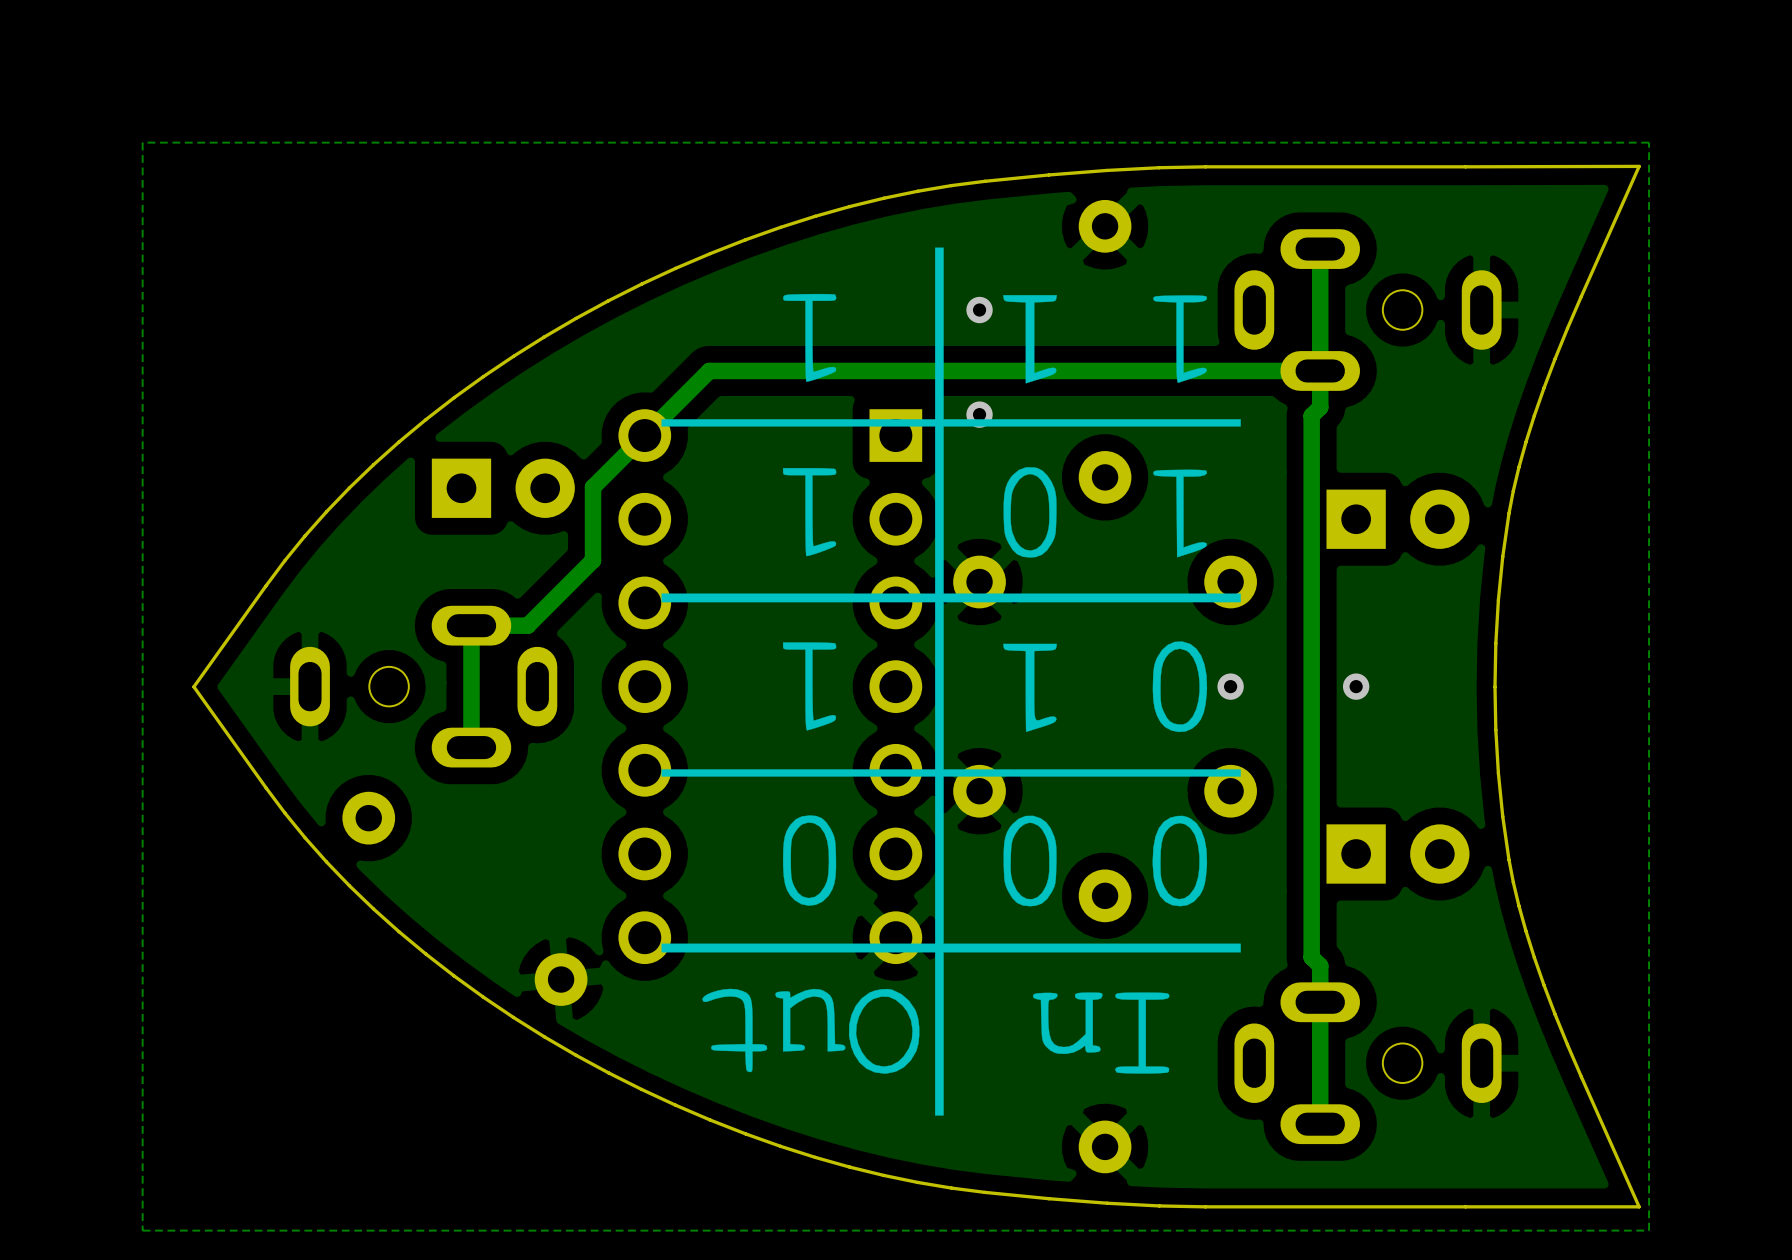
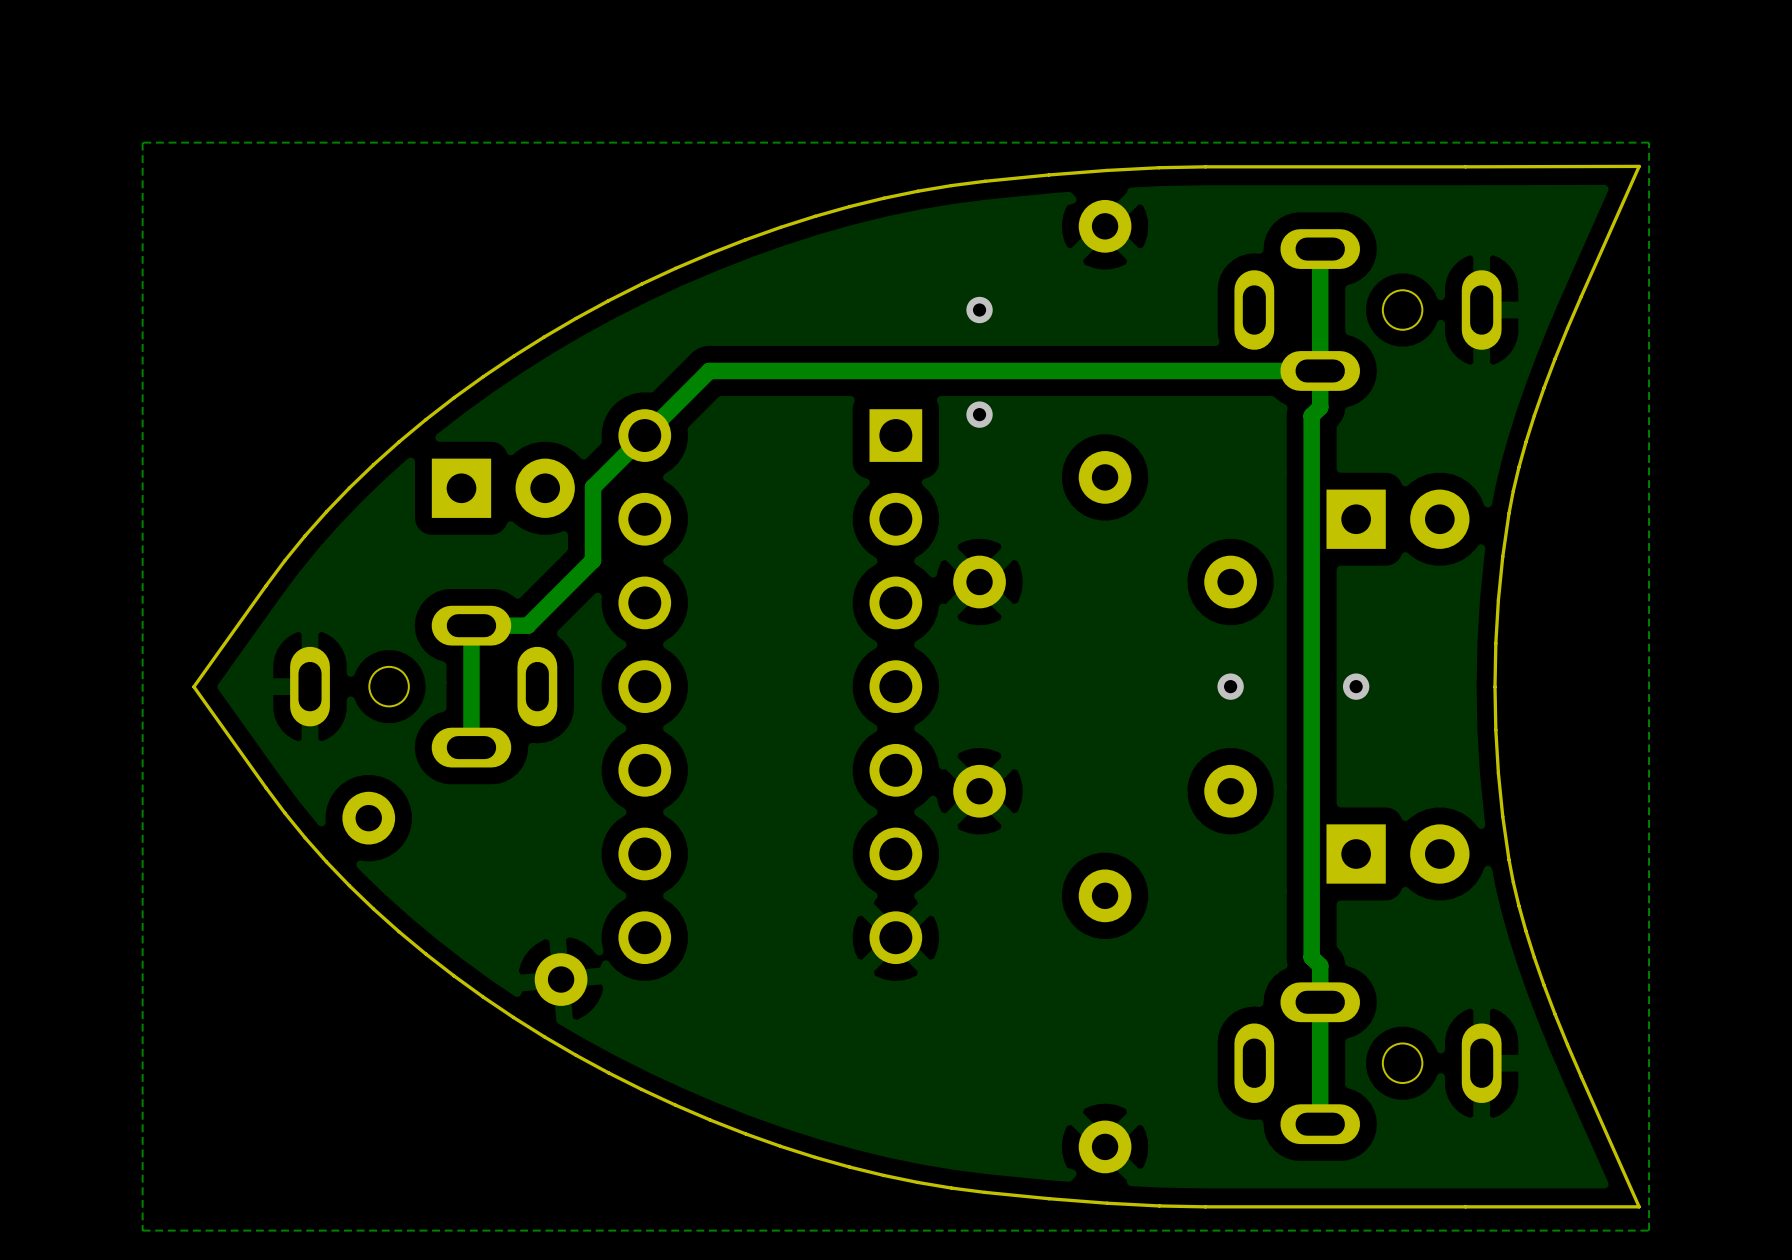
drawing: [661, 247, 1241, 1116] -> none

